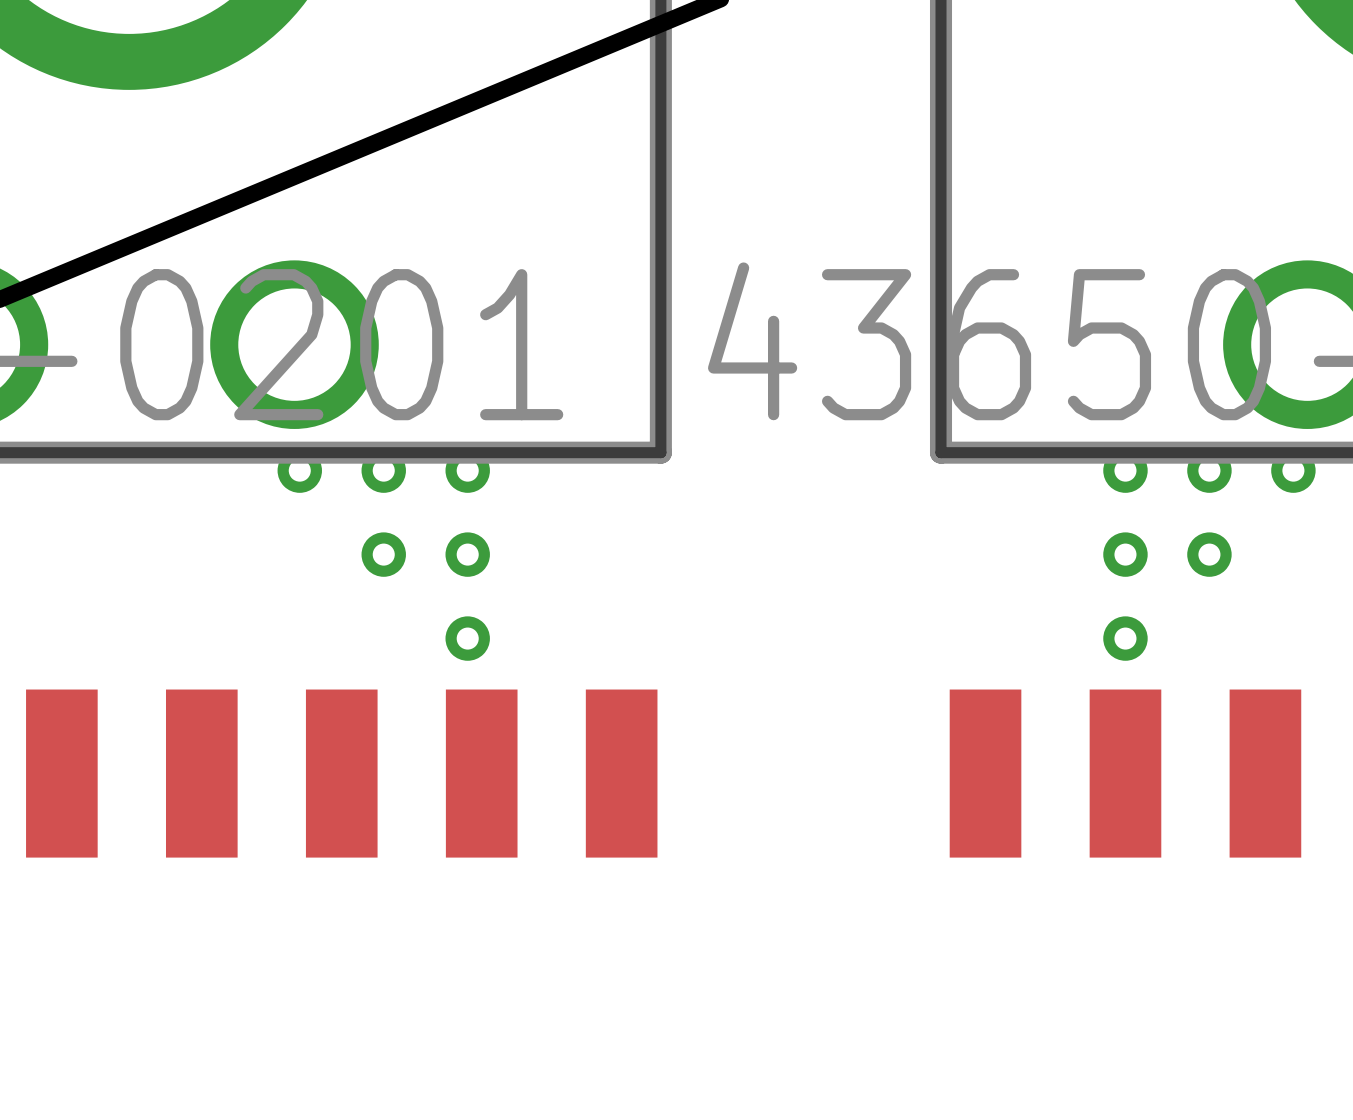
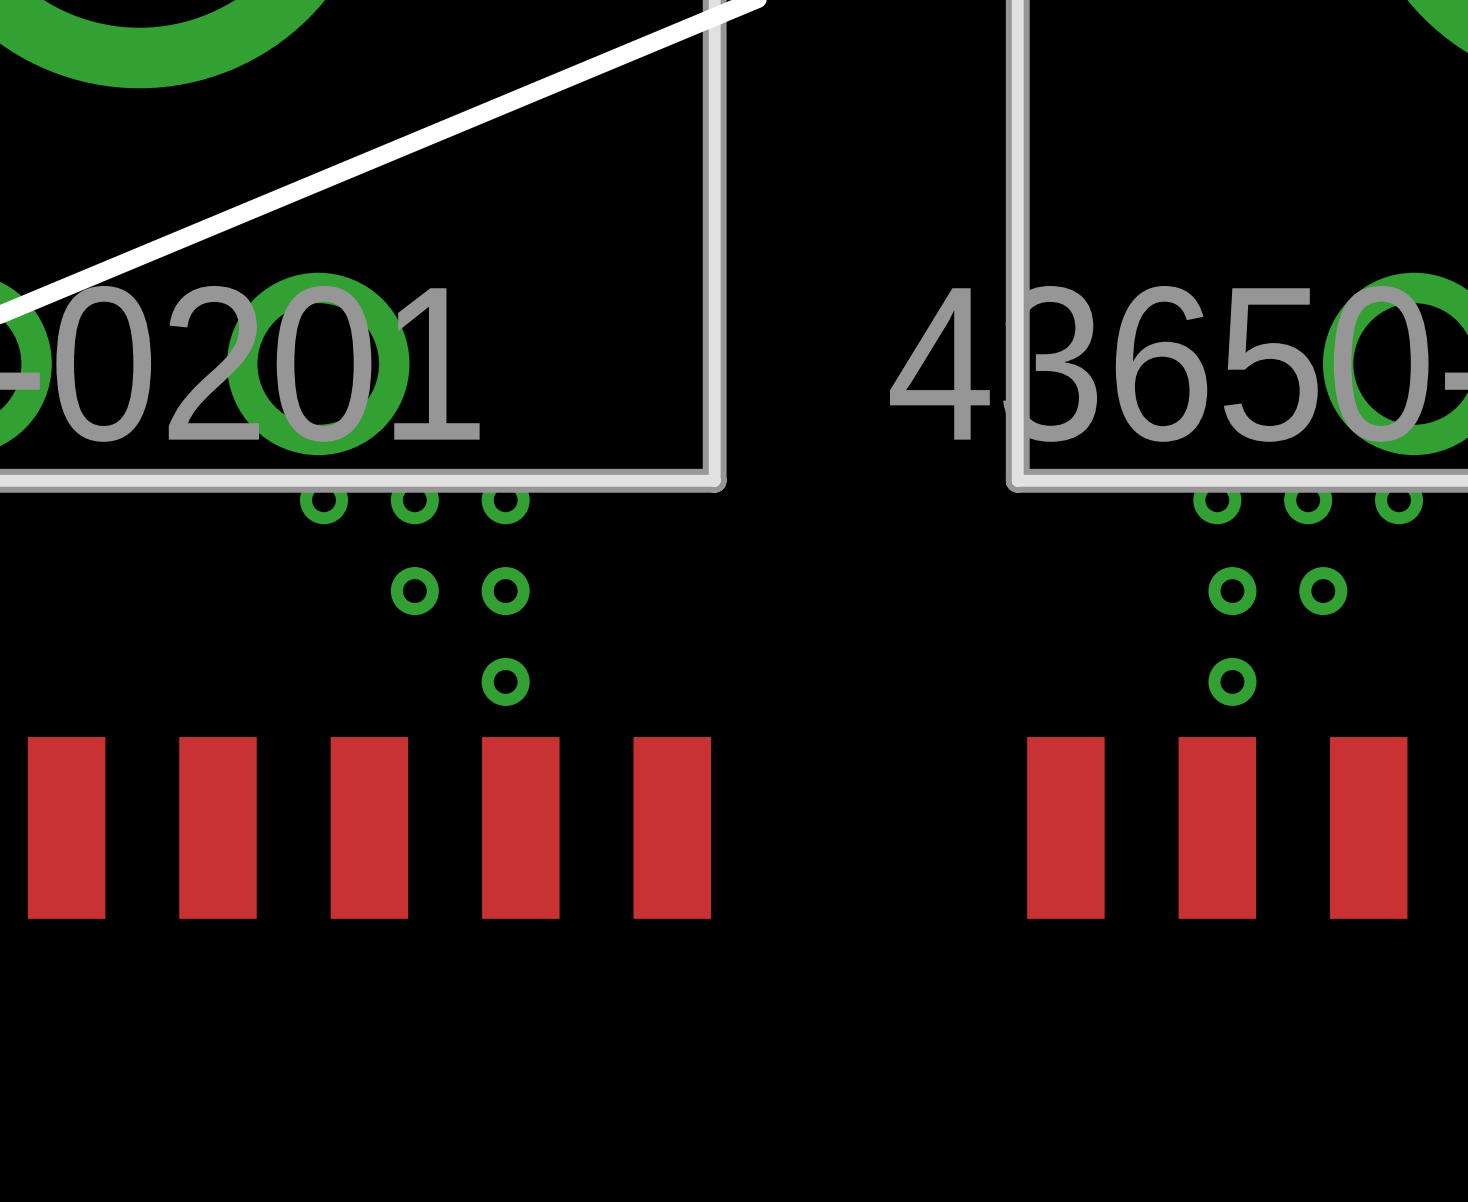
via position: (1125, 554) -> (1232, 591)
via position: (1209, 554) -> (1323, 591)
via position: (1125, 638) -> (1232, 681)

